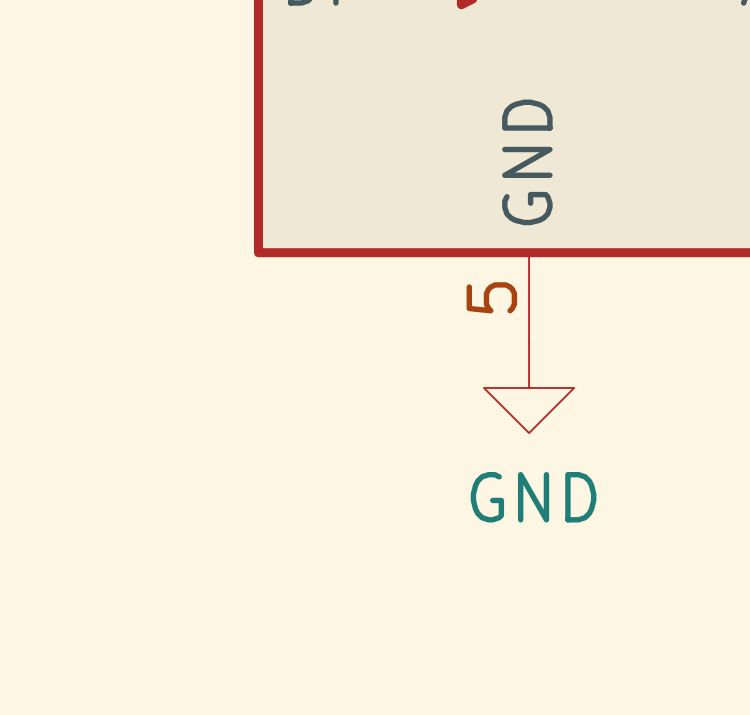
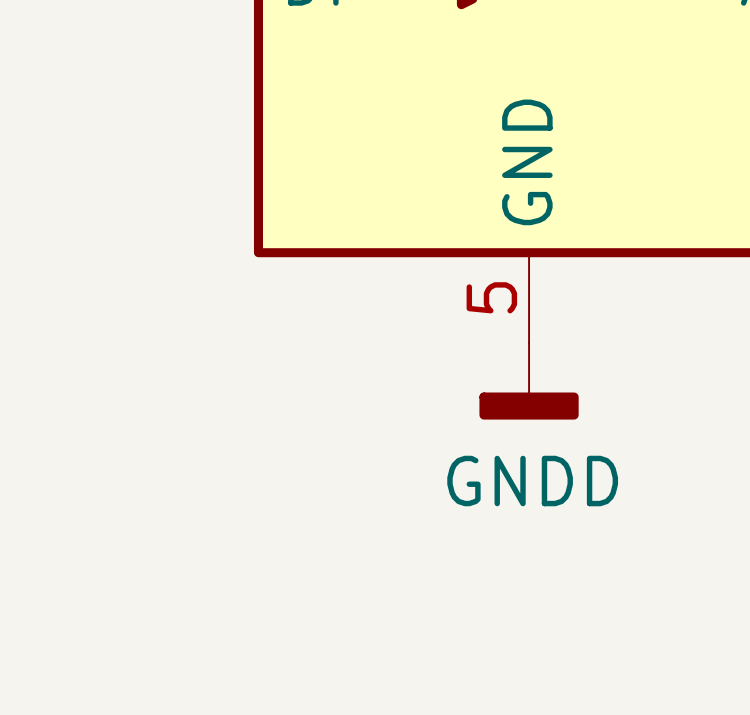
power symbol: GND (529, 387) -> GNDD (529, 381)

